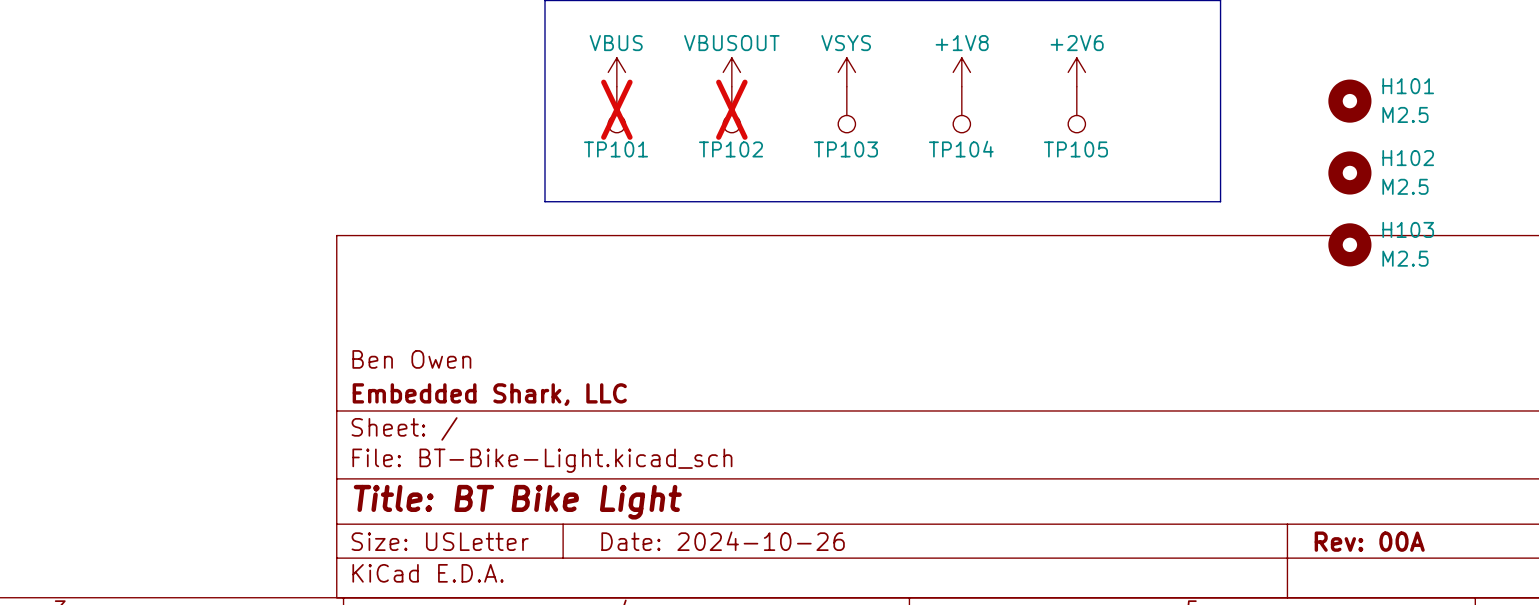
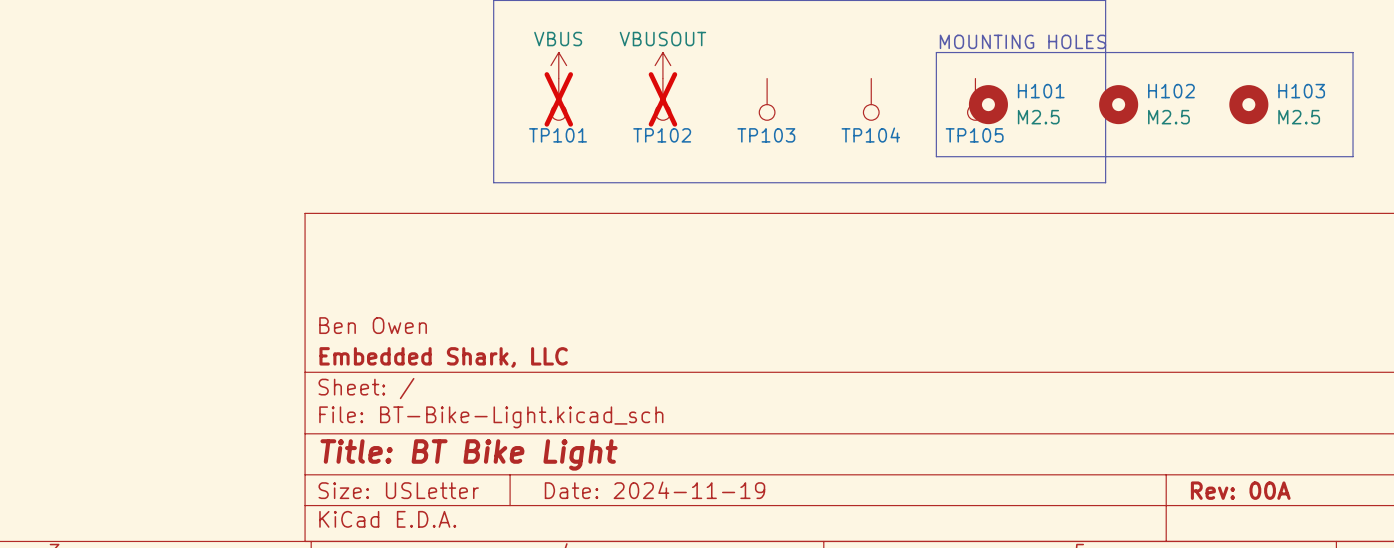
text: none -> MOUNTING HOLES (1022, 41)
line: none -> (936, 52) (1353, 52) (1353, 156) (936, 156) (936, 52)
power symbol: VSYS (846, 72) -> none
power symbol: +1V8 (961, 72) -> none
power symbol: +2V6 (1076, 72) -> none
H101 position: (1349, 101) -> (988, 104)
H102 position: (1349, 172) -> (1118, 104)
H103 position: (1349, 244) -> (1248, 104)
title block: Date: 2024-10-26 (723, 541) -> Date: 2024-11-19 (655, 490)

